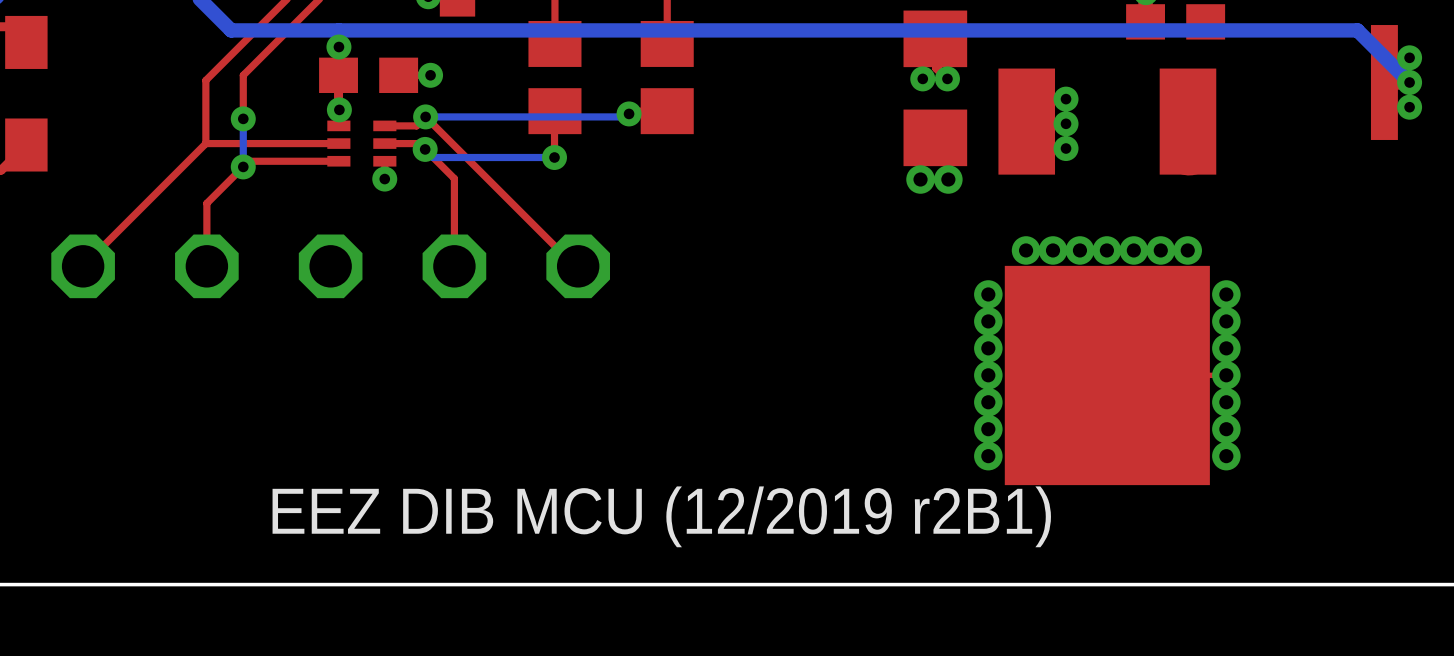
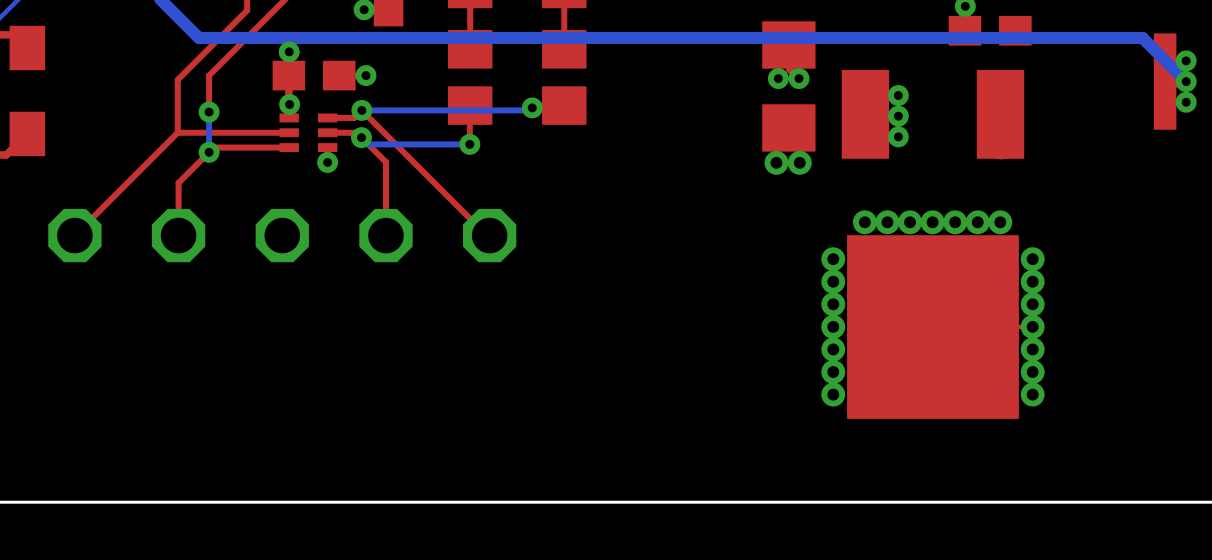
text: EEZ DIB MCU (12/2019 r2B1) (661, 516) -> none

